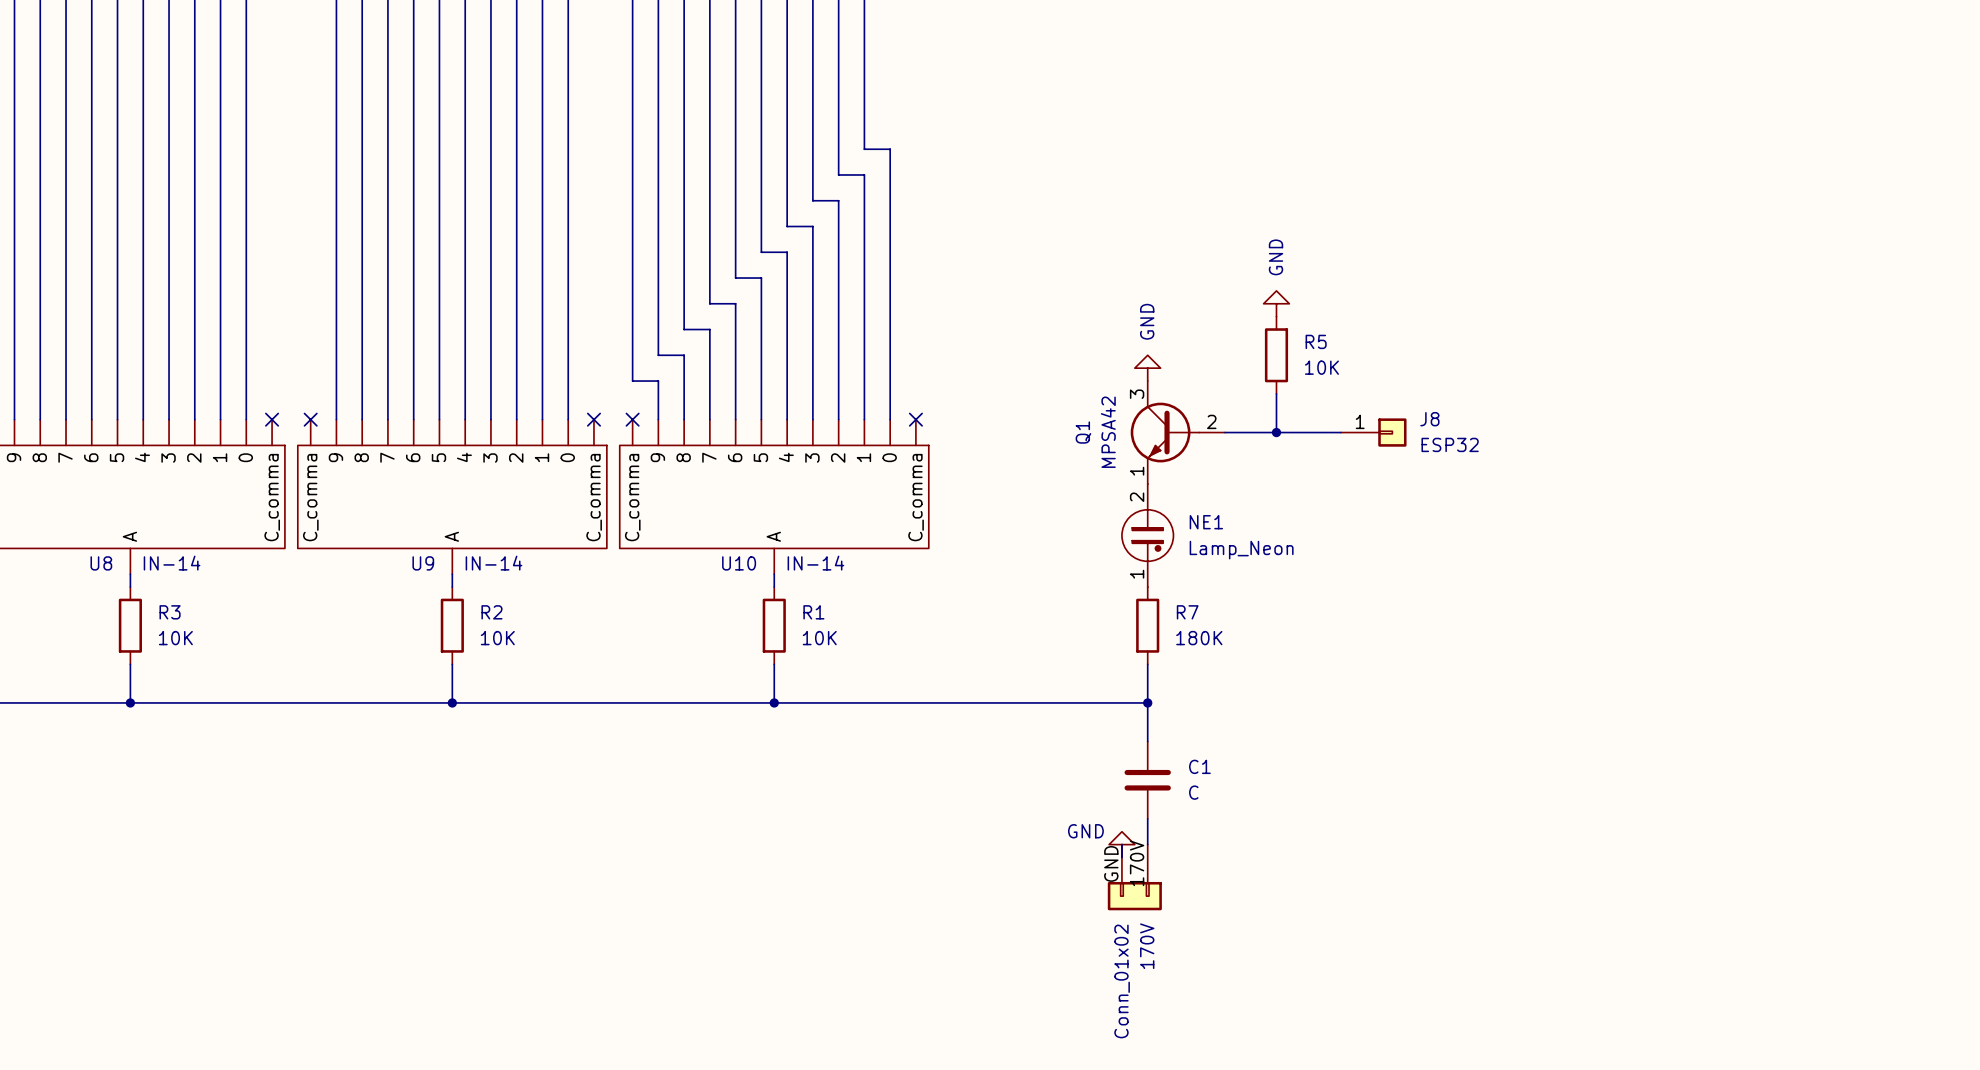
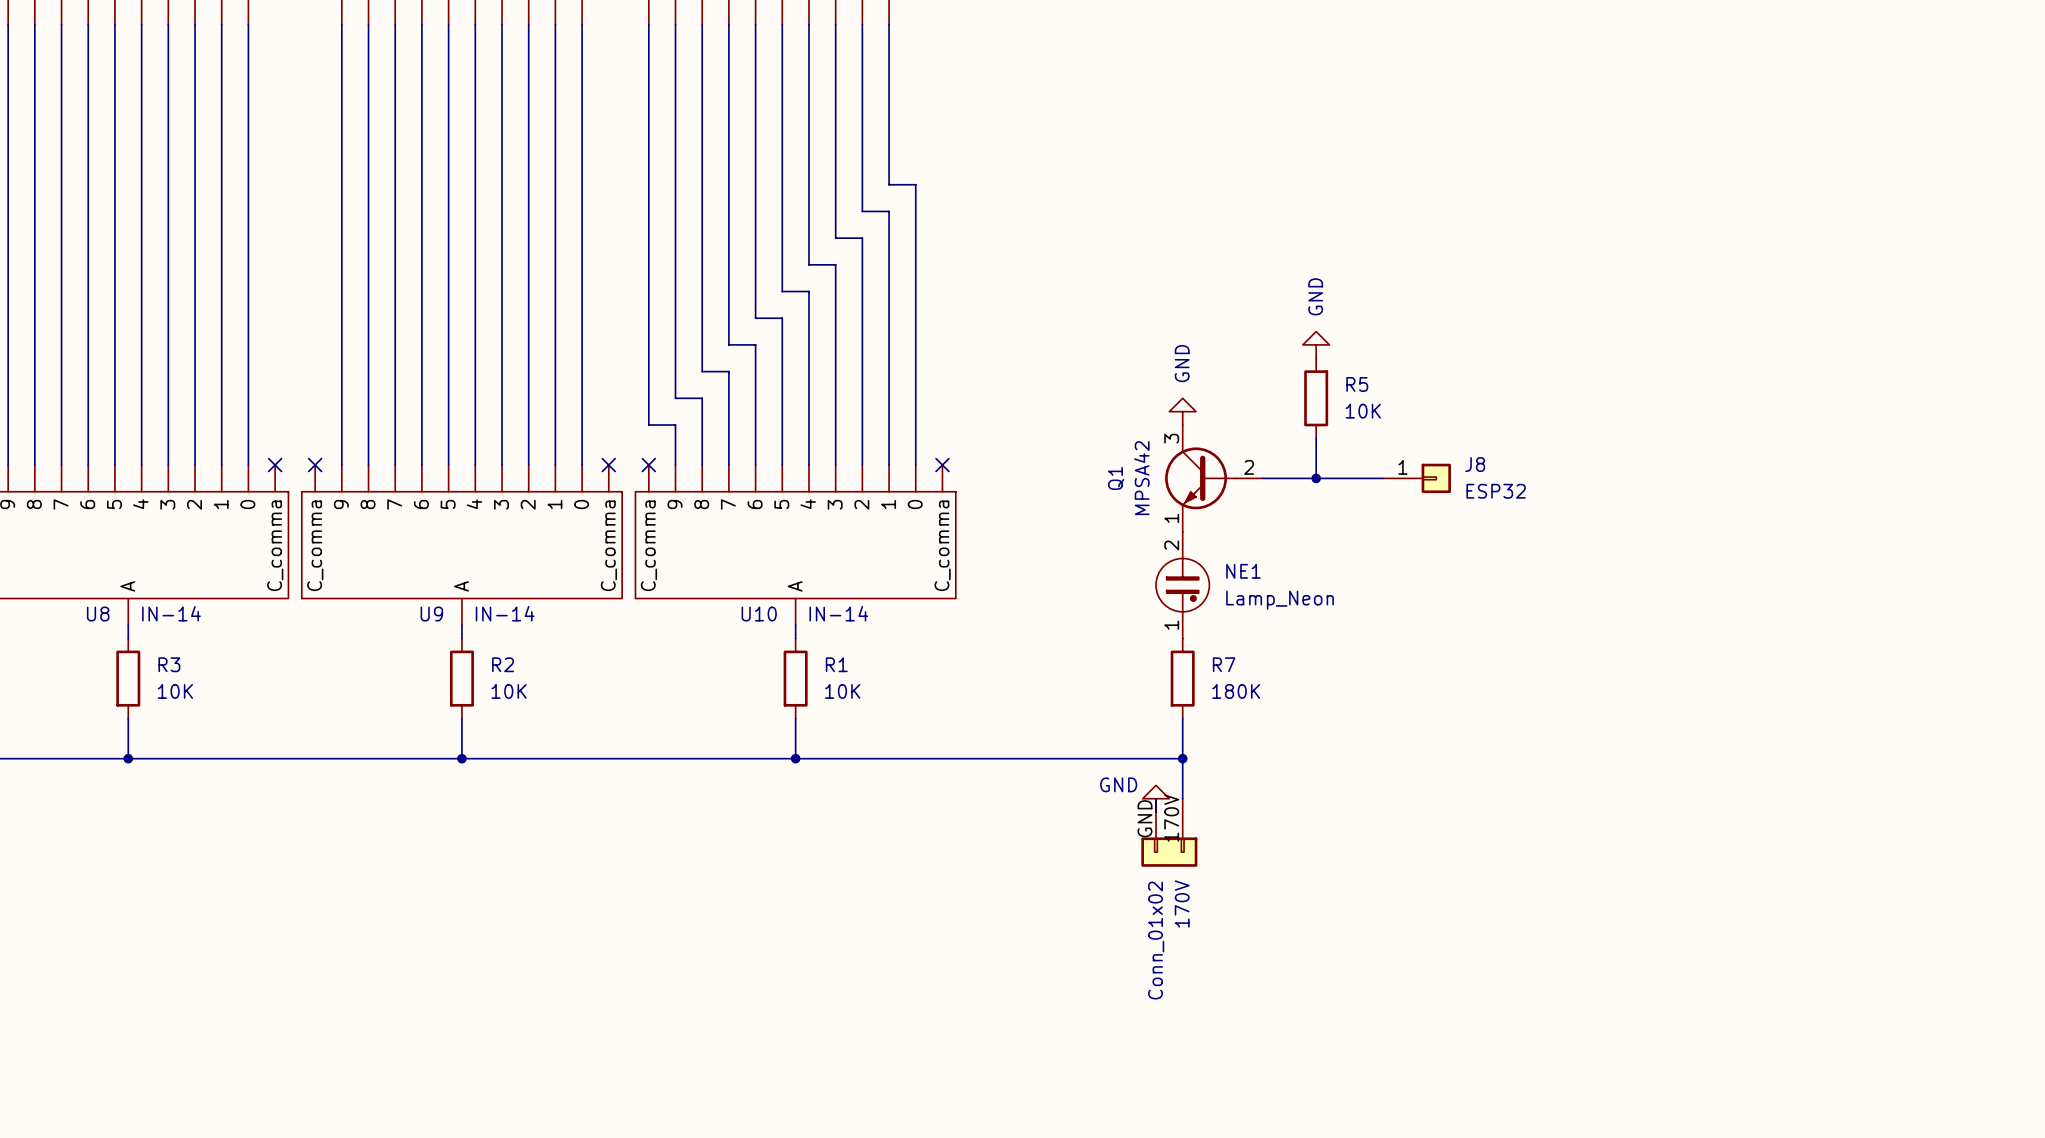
C1: C (1147, 780) -> none
wire: (1147, 818) (1147, 844) -> none
wire: (1121, 844) (1121, 857) -> (1156, 798) (1156, 812)
power symbol position: GND (1121, 844) -> GND (1156, 798)
170V position: (1134, 877) -> (1169, 832)

